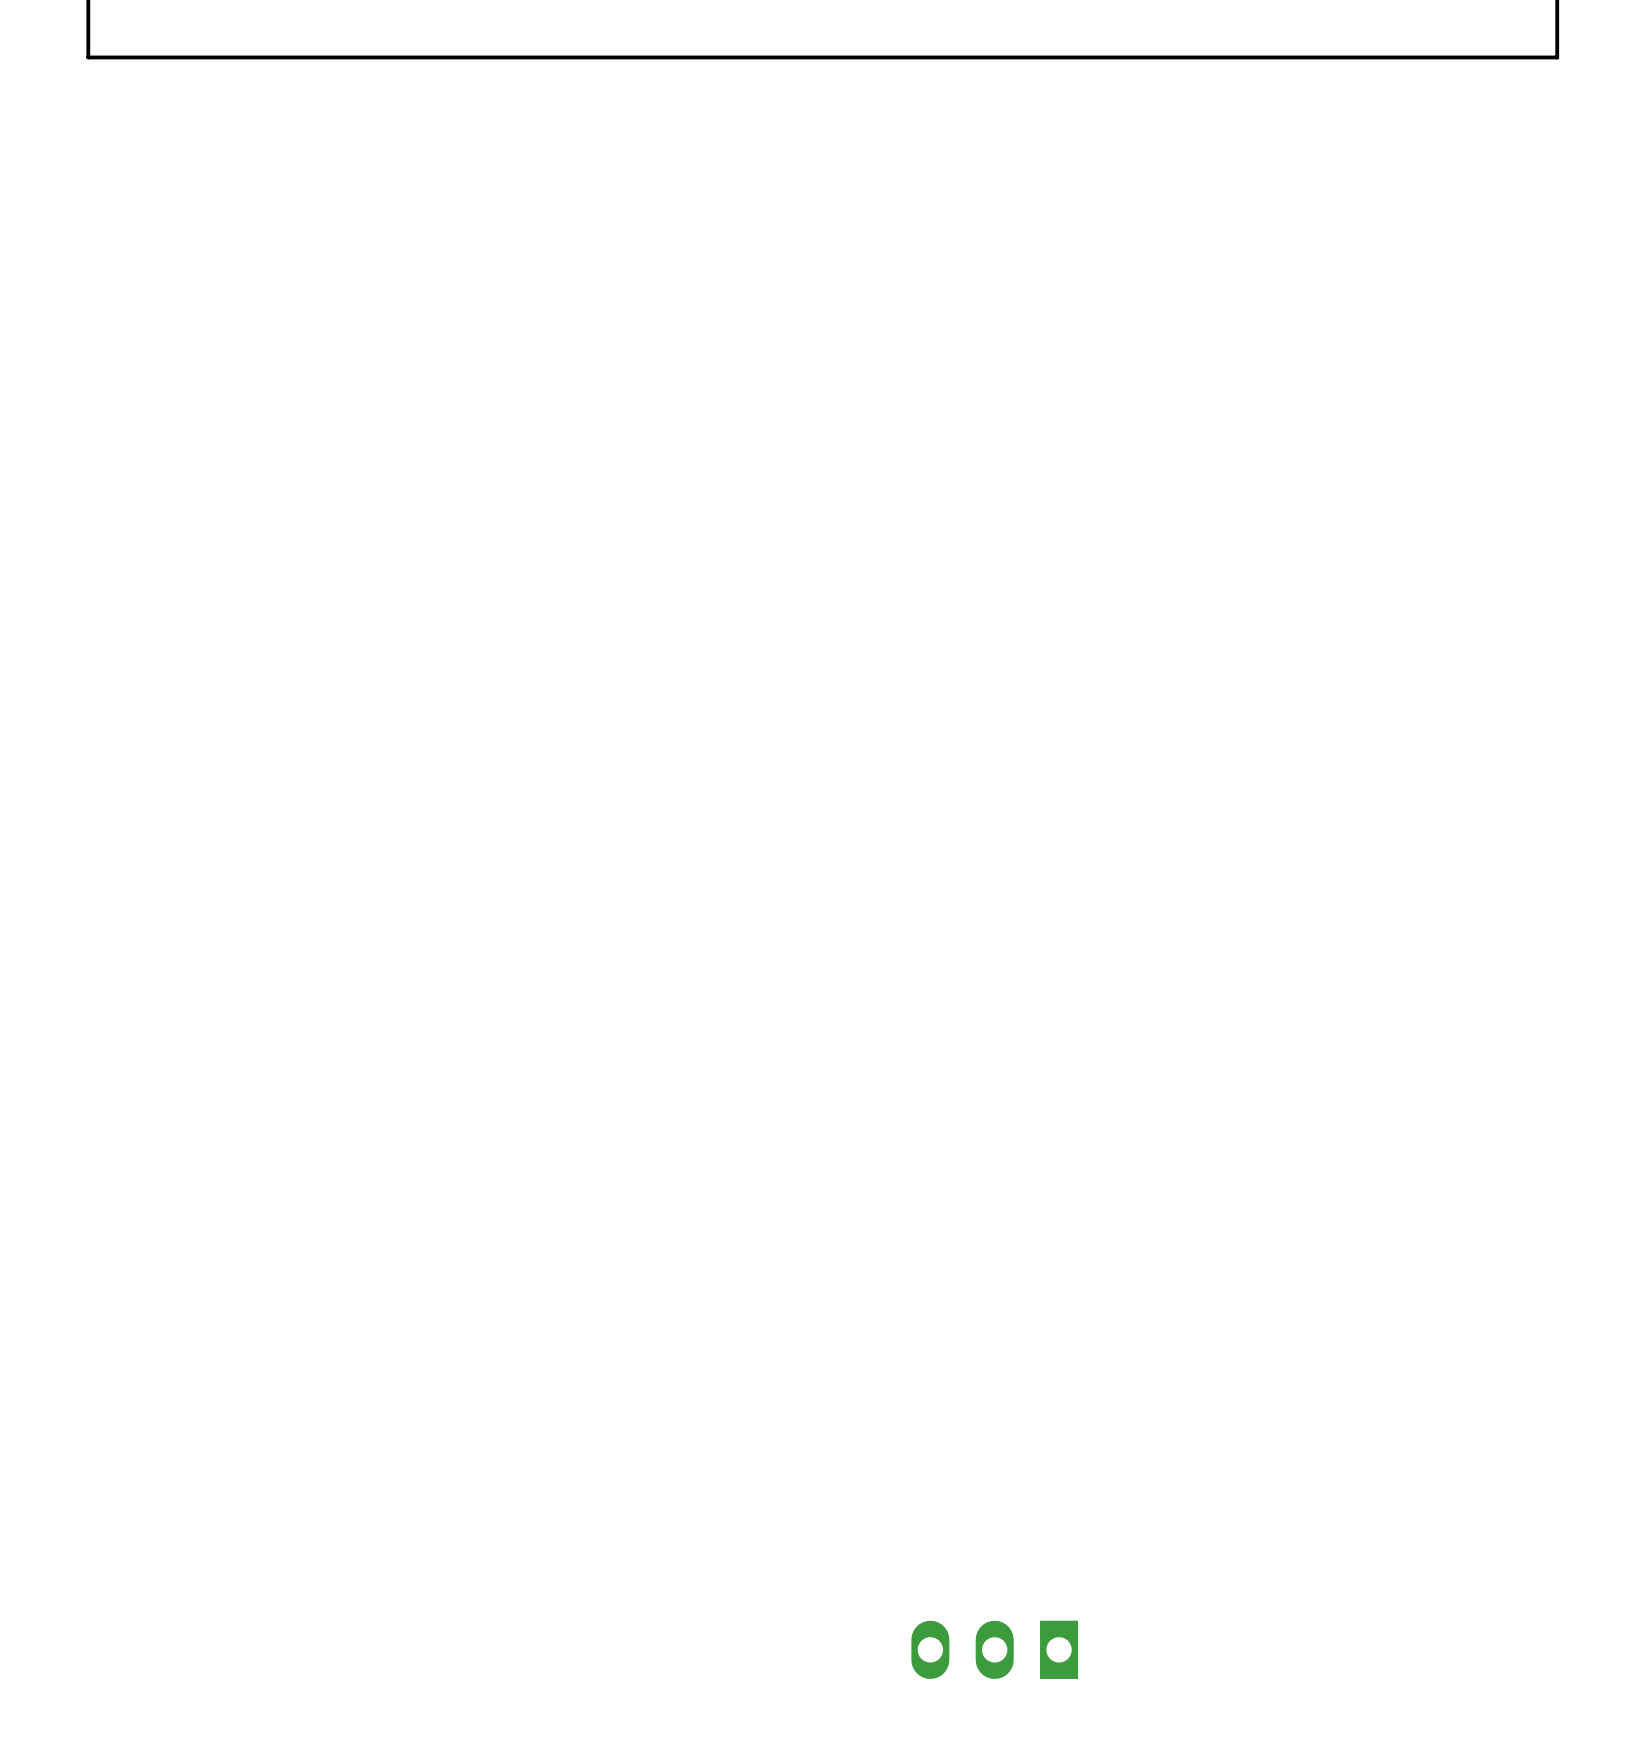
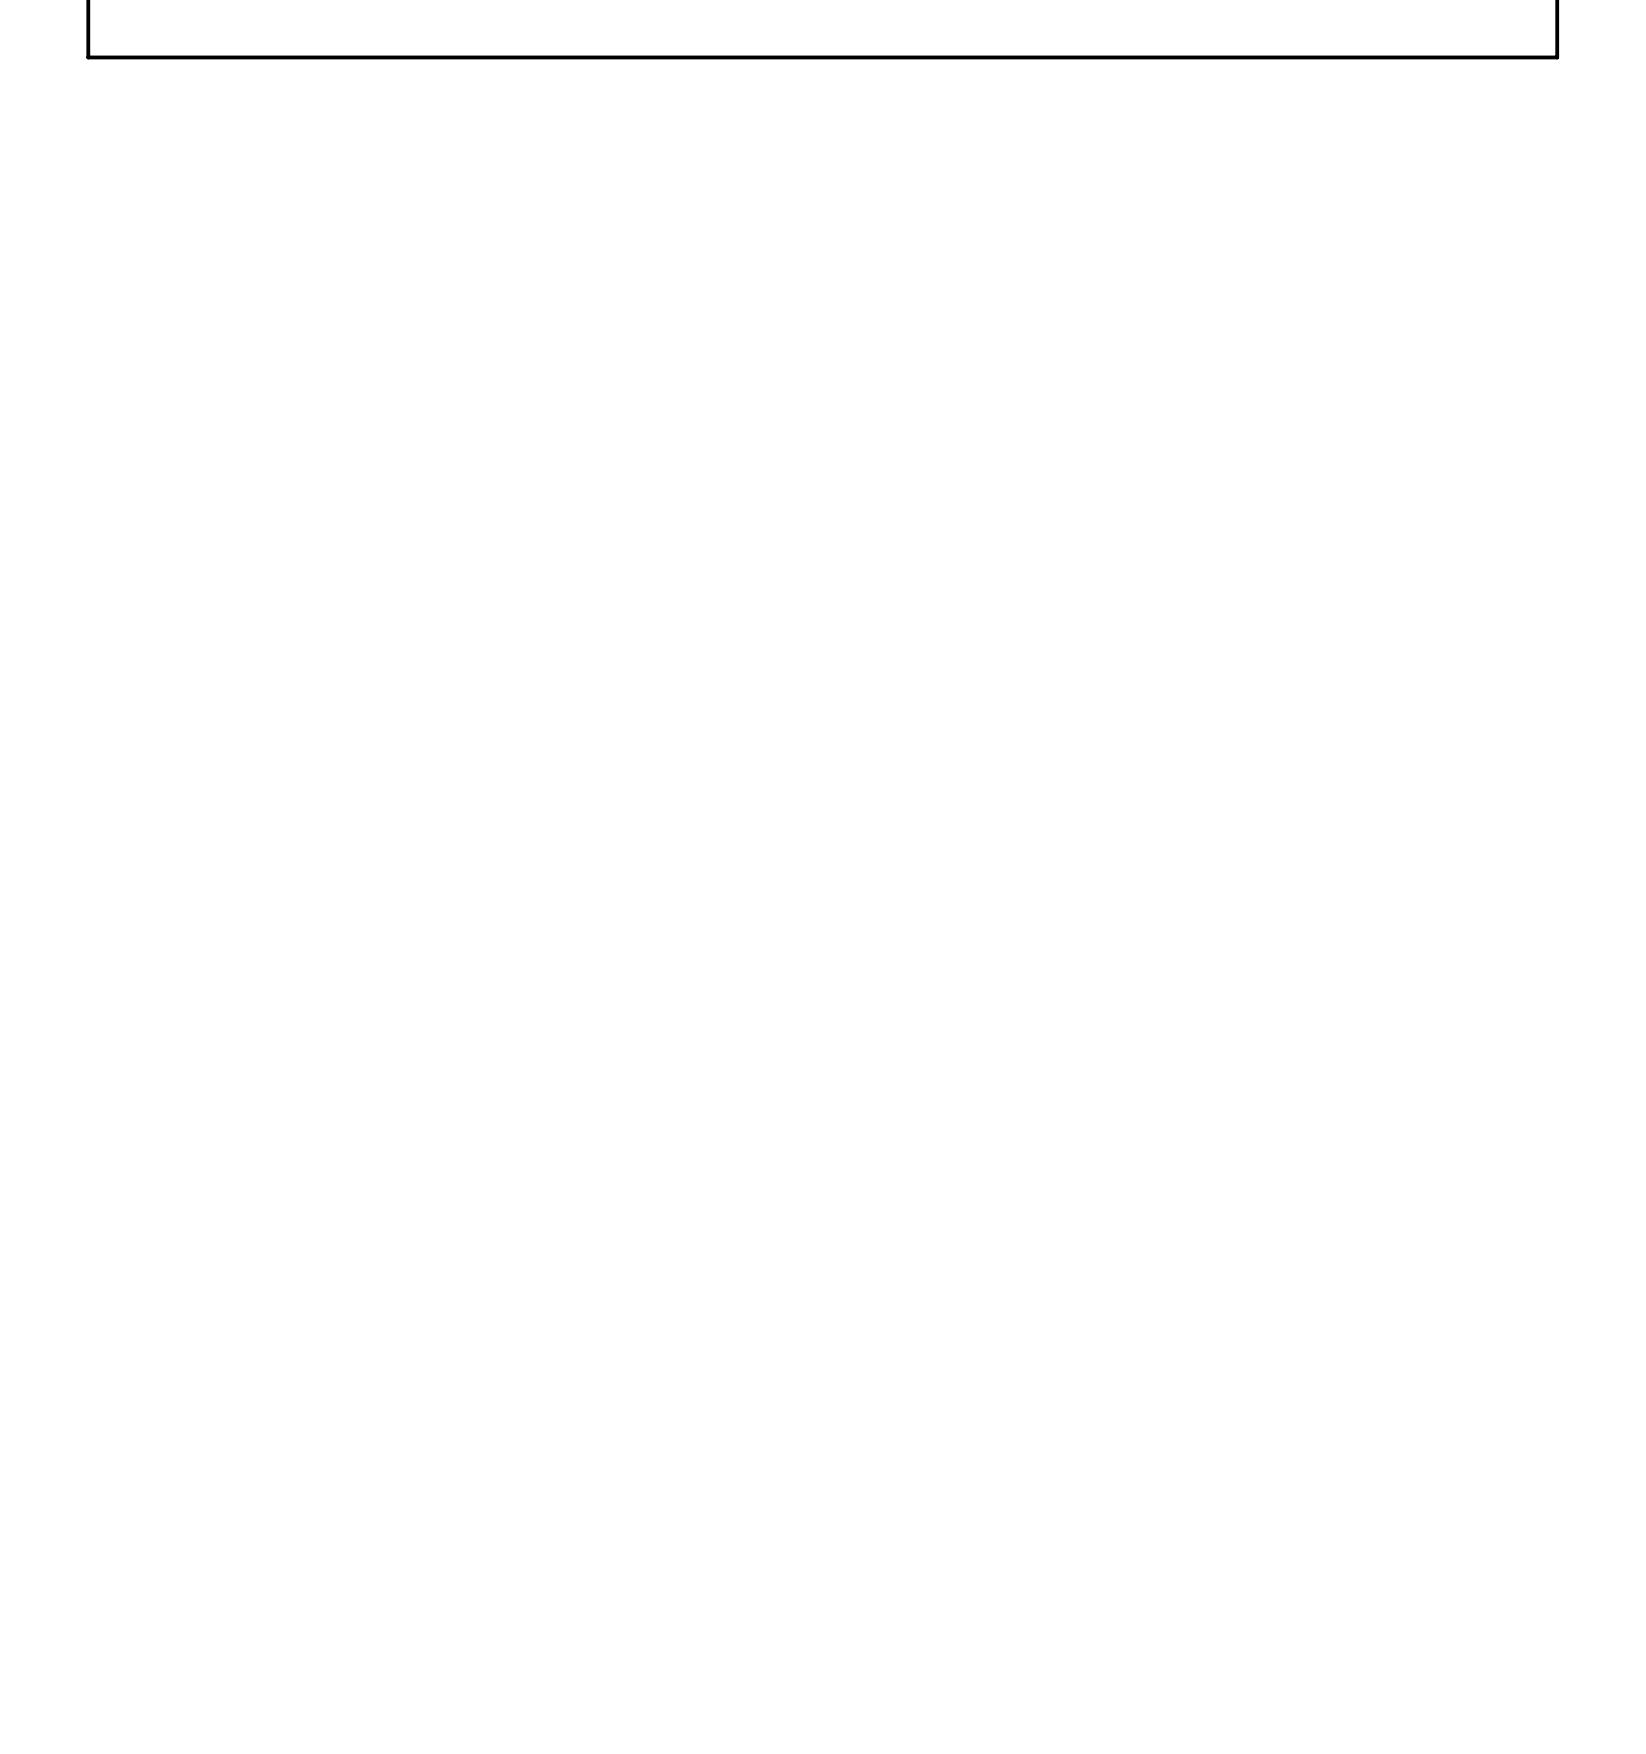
part: (994, 1649) -> none

